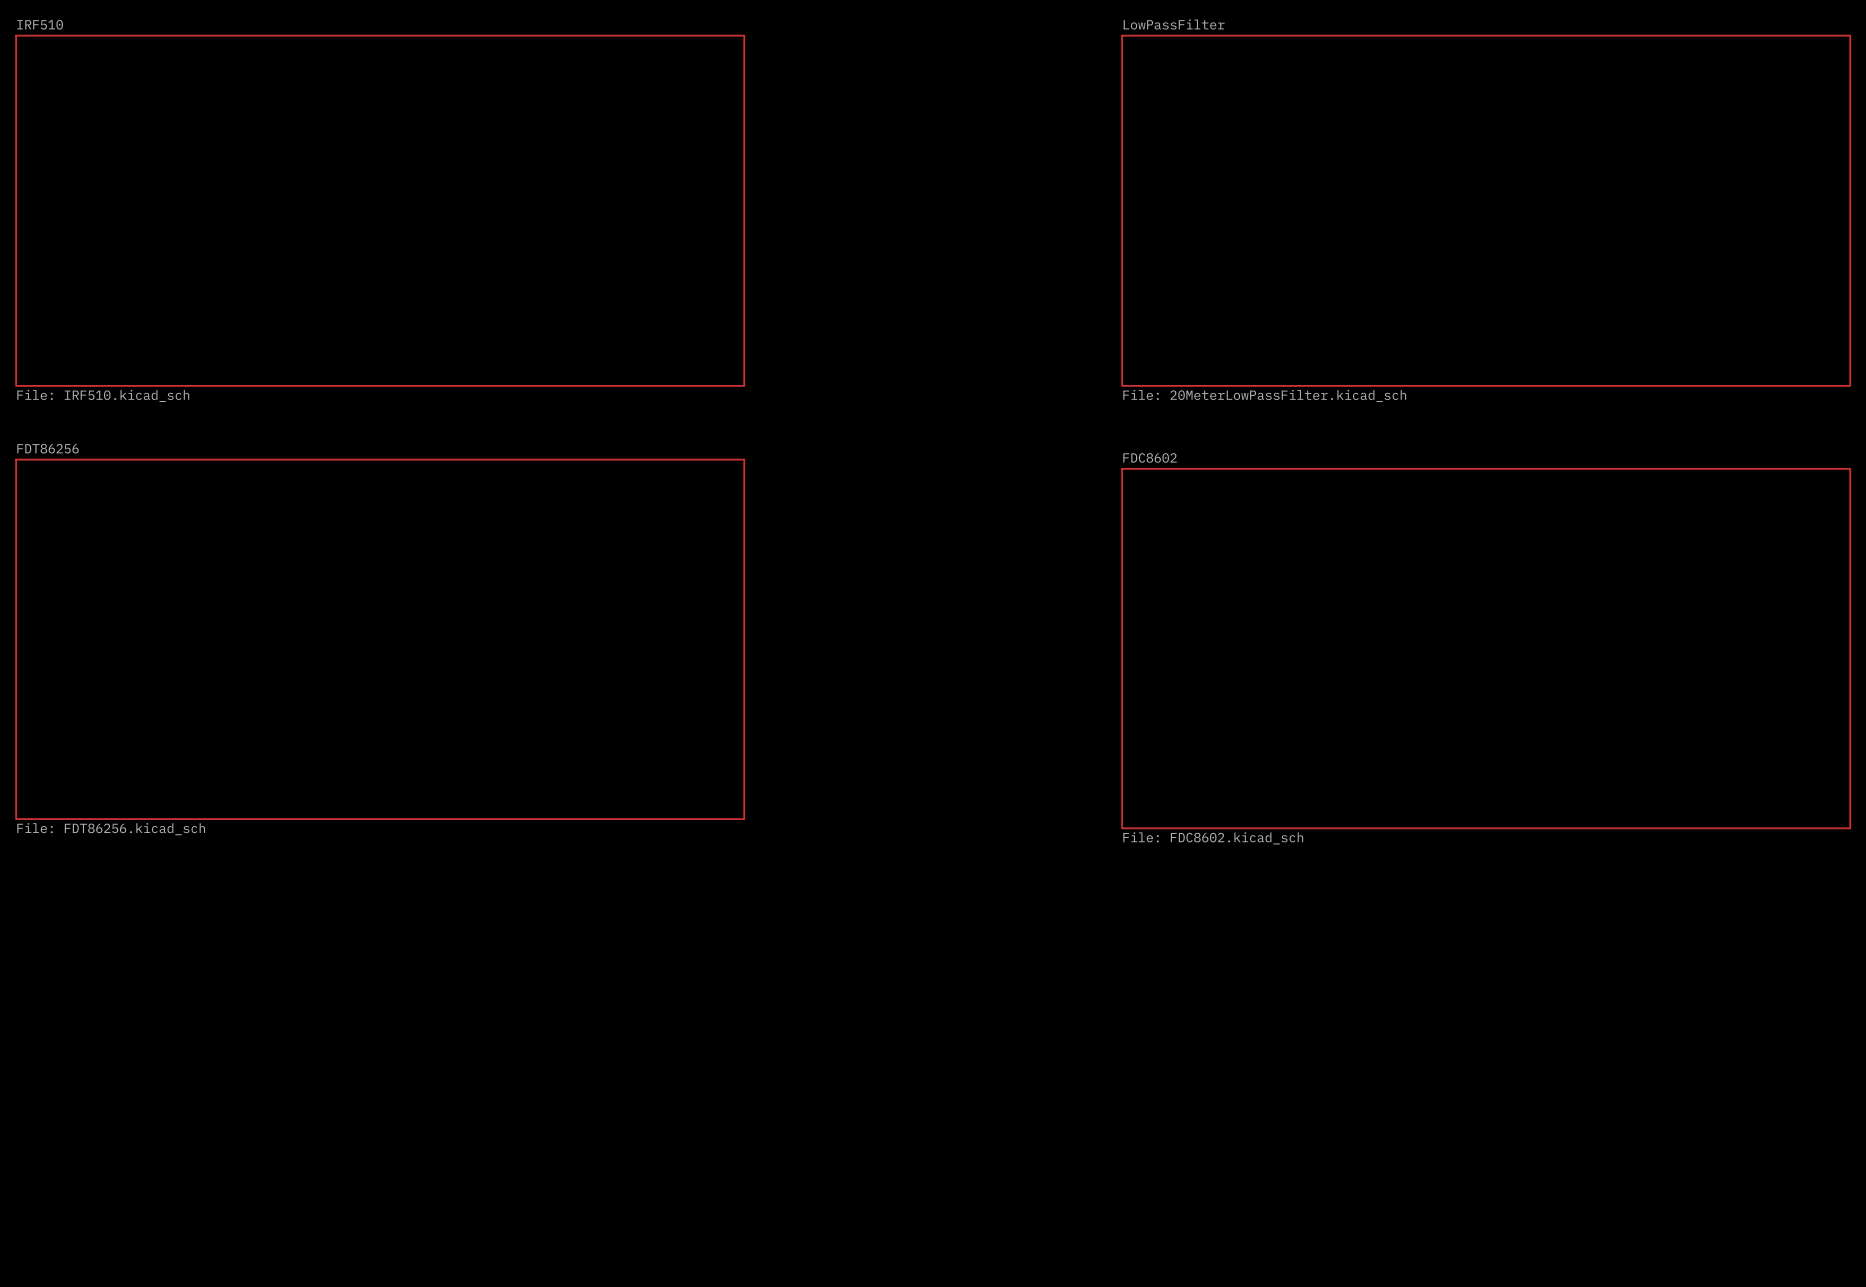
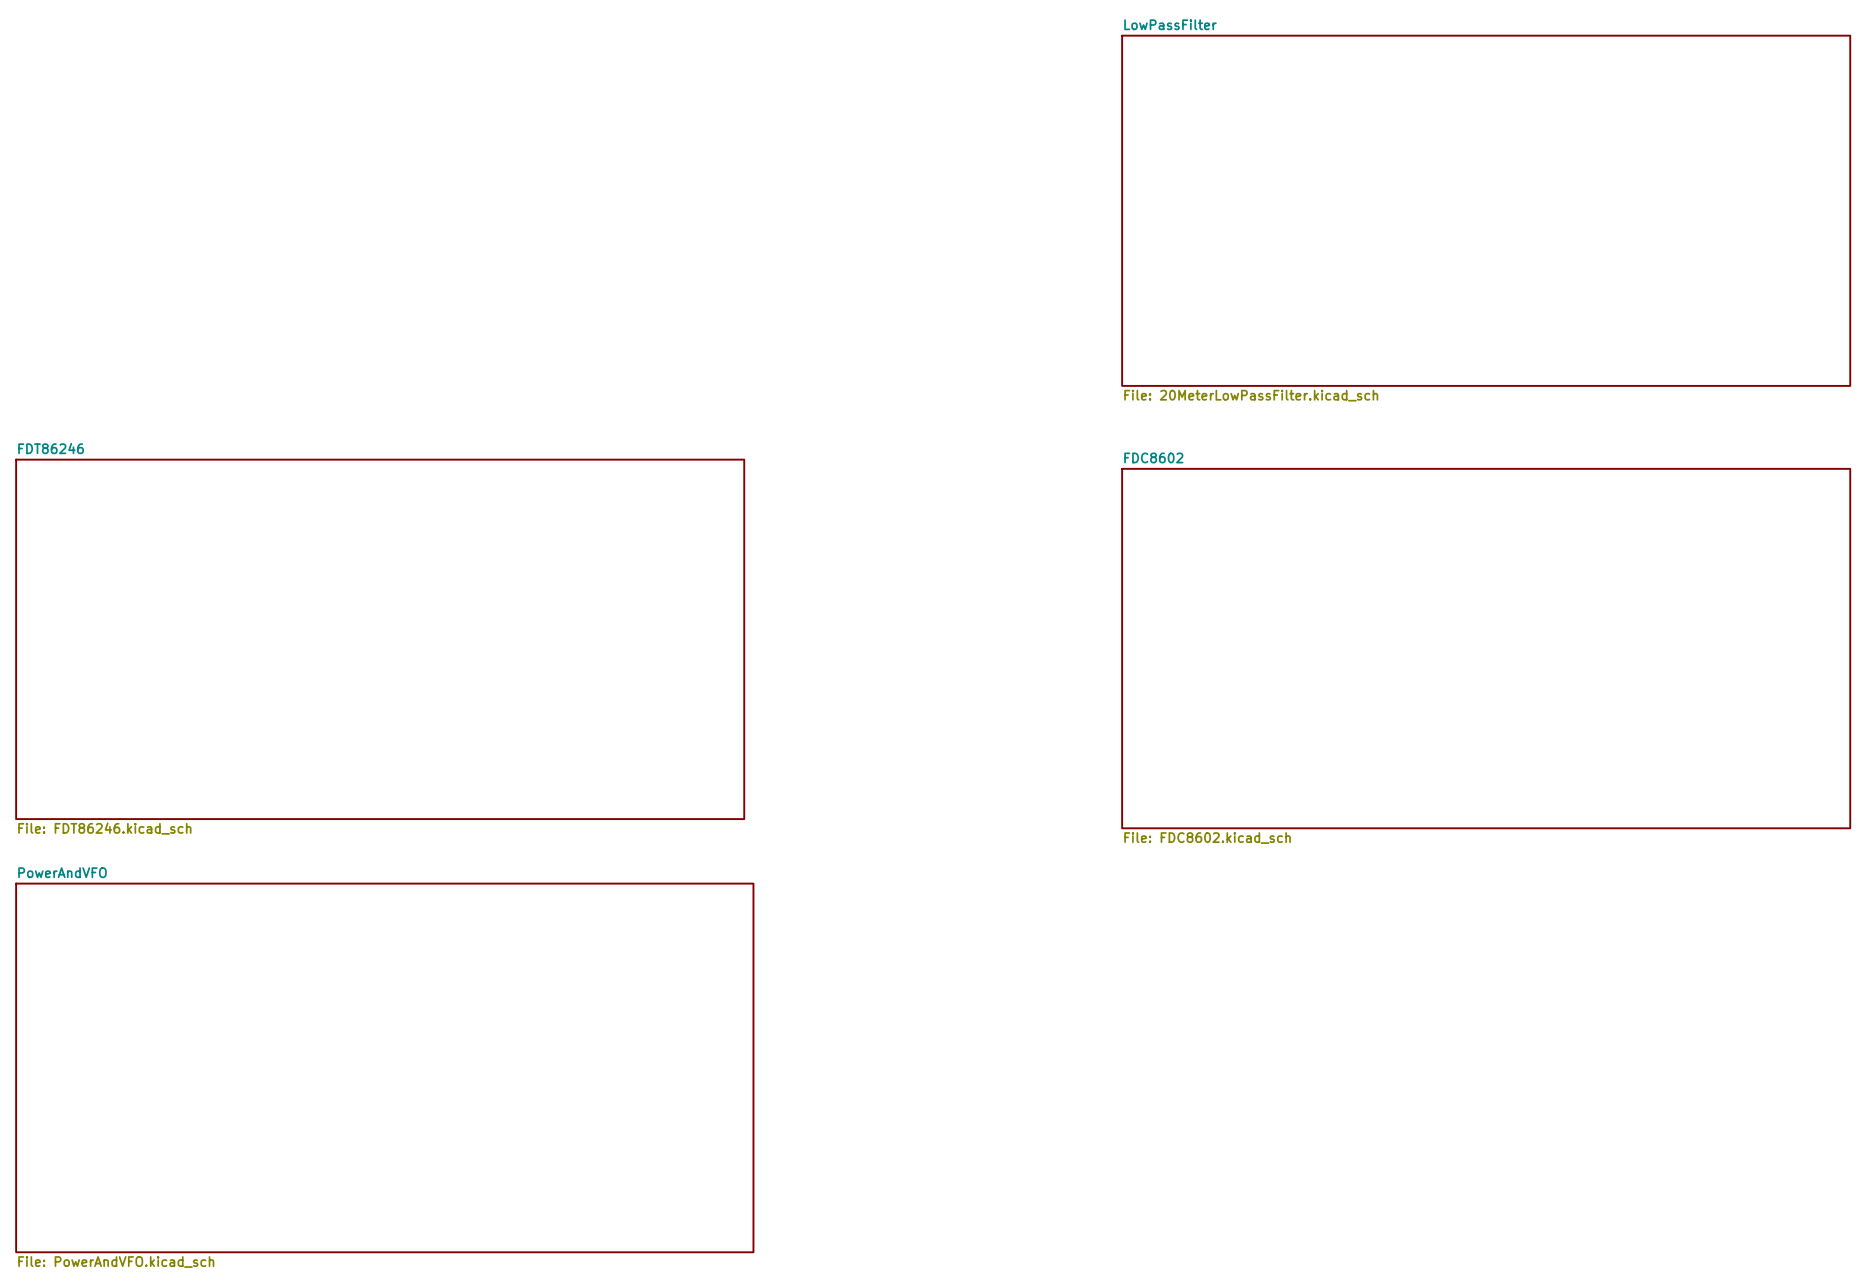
sheet IRF510: File: IRF510.kicad_sch (380, 210) -> none
sheet FDT86256 name: FDT86256 (47, 448) -> FDT86246 (51, 448)
sheet FDT86256 value: File: FDT86256.kicad_sch (111, 829) -> File: FDT86246.kicad_sch (104, 828)
sheet PowerAndVFO: none -> File: PowerAndVFO.kicad_sch (384, 1067)

